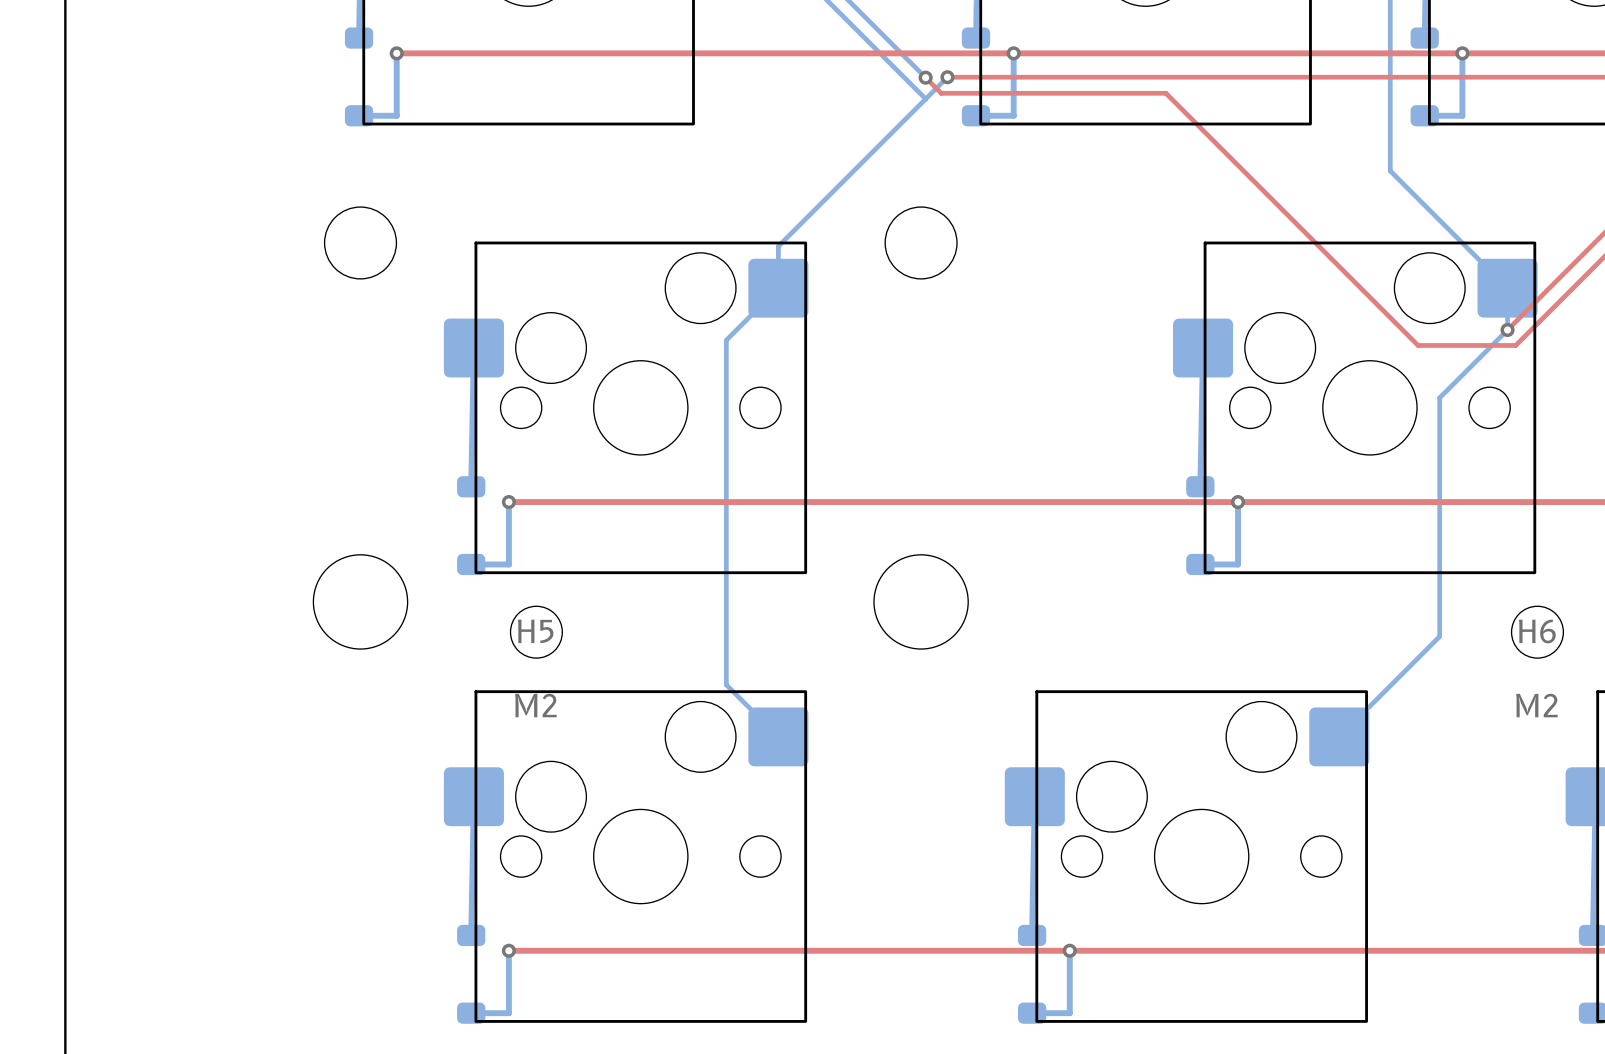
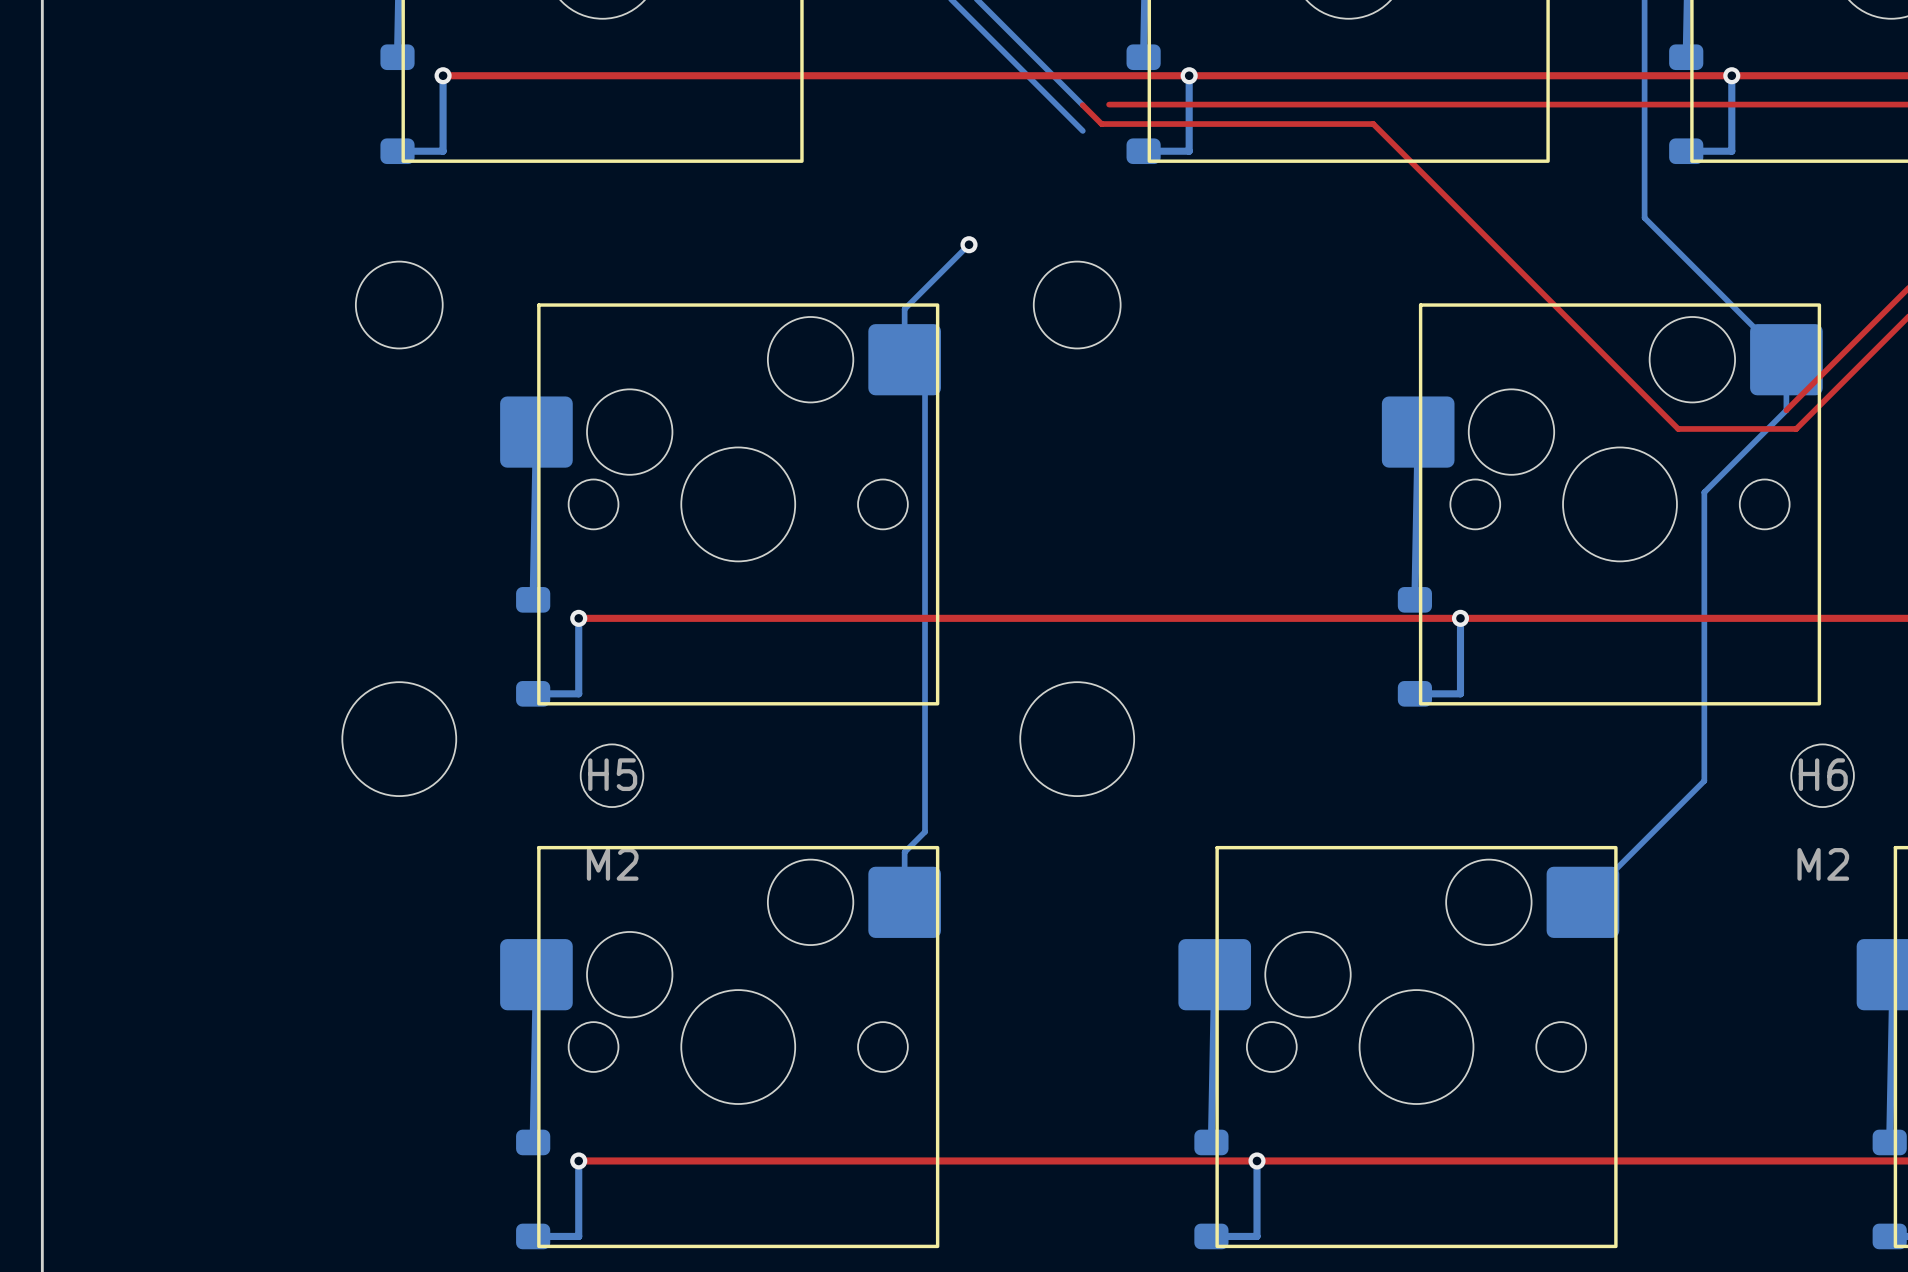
via: (925, 77) -> none
bottom track: (947, 77) (831, 193) -> none
via: (947, 77) -> none
via: none -> (969, 244)
bottom track: (778, 288) (726, 340) (726, 684) (778, 736) -> (904, 359) (925, 380) (925, 831) (904, 852) (904, 902)
via: (1507, 330) -> none

